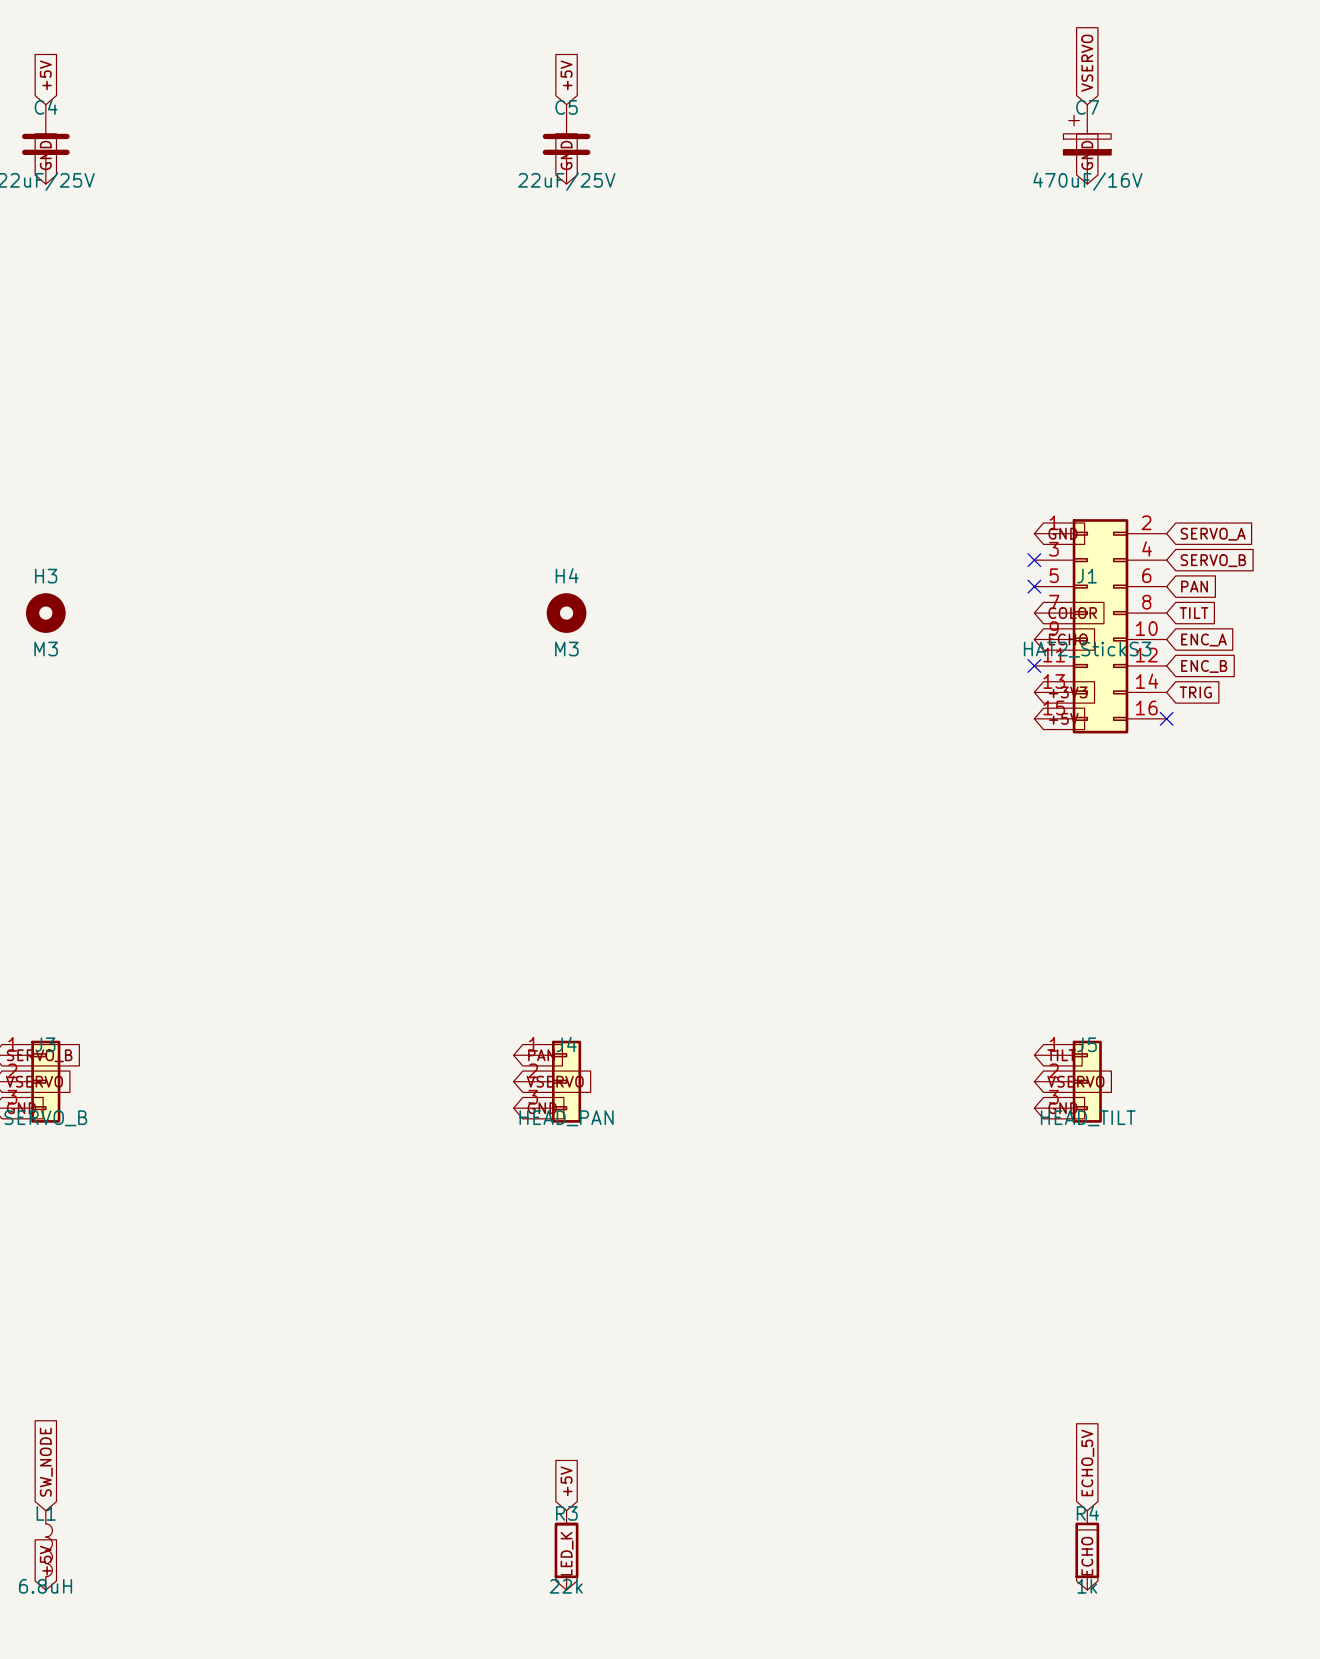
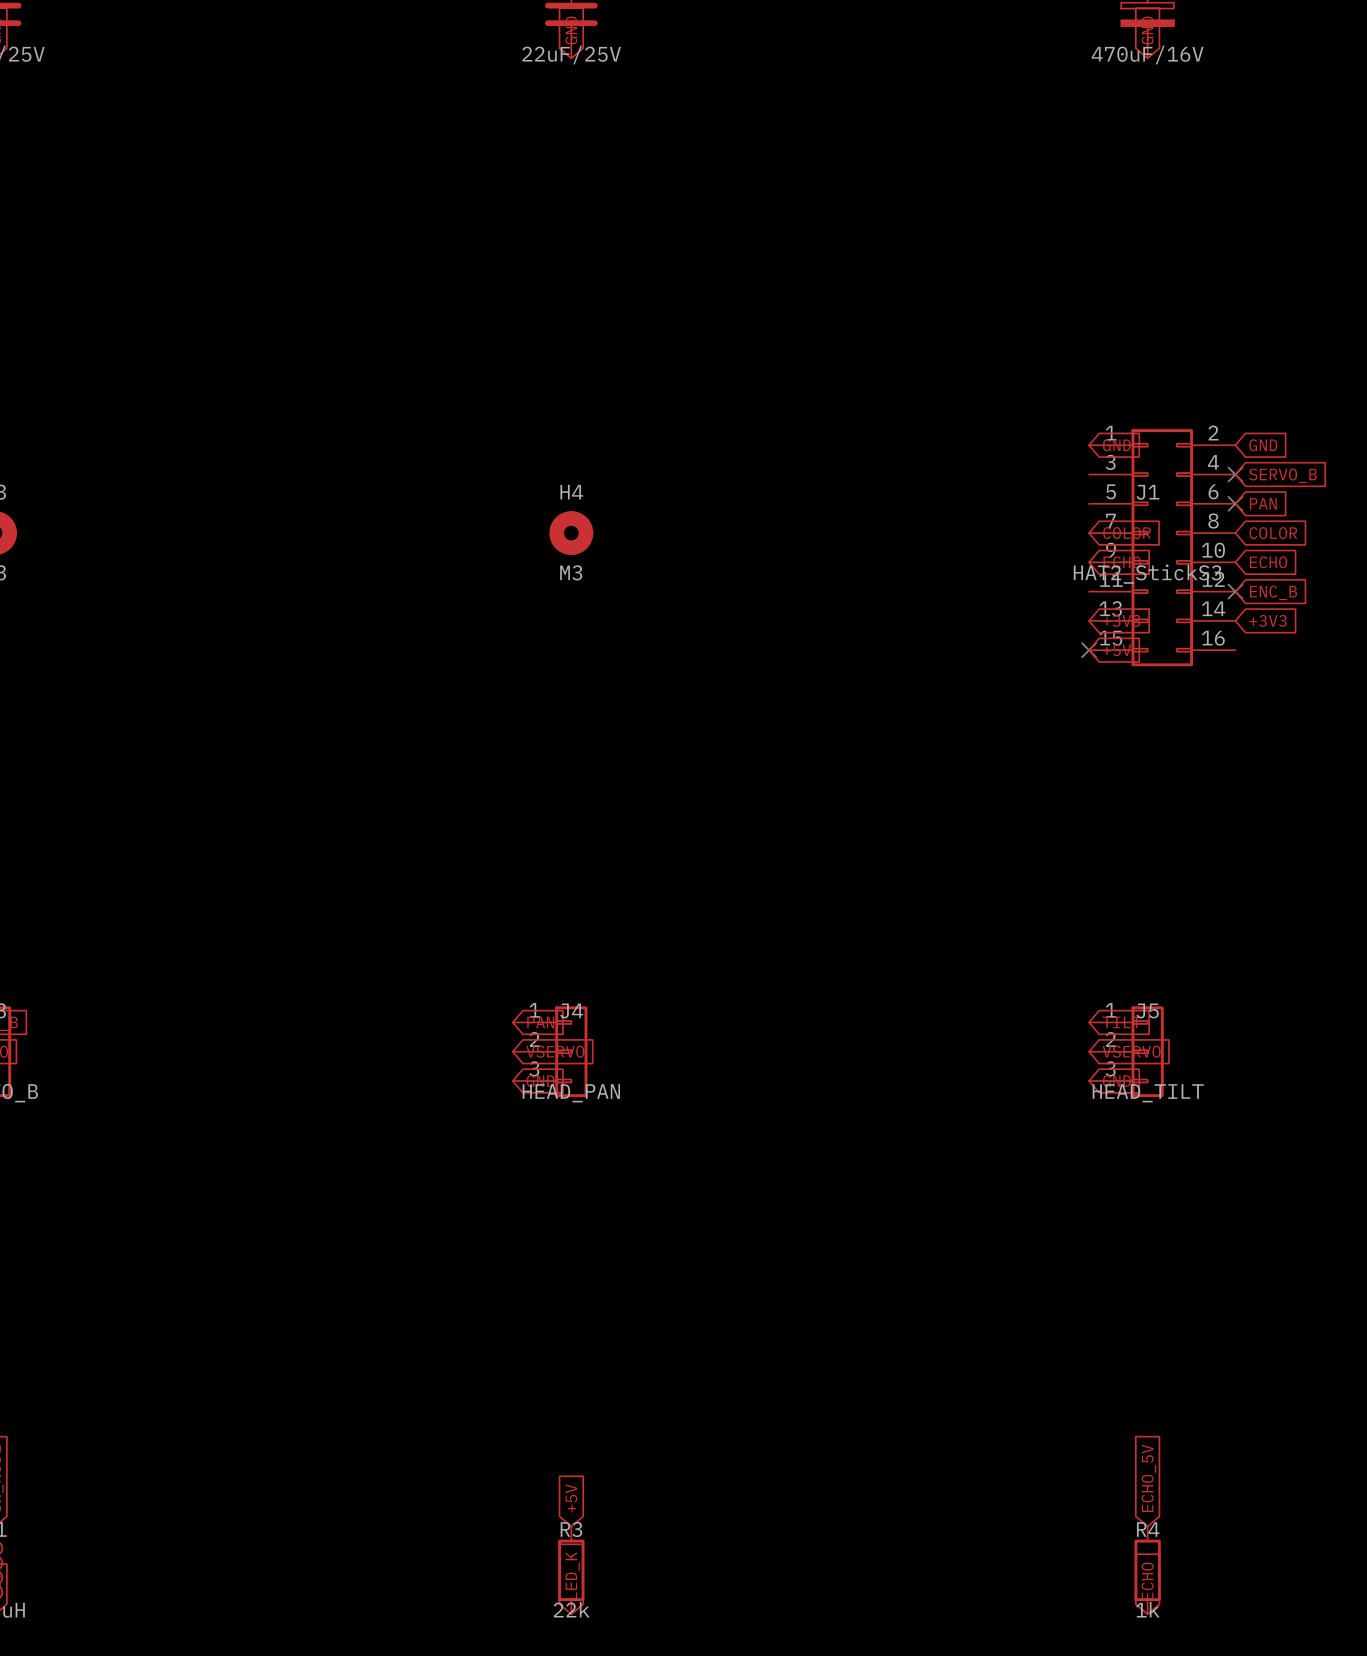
global label: SERVO_A (1213, 534) -> GND (1263, 445)
no-connect mark: (1034, 560) -> none
no-connect mark: none -> (1235, 474)
no-connect mark: (1034, 586) -> none
no-connect mark: none -> (1235, 503)
global label: TILT (1194, 613) -> COLOR (1273, 533)
global label: ENC_A (1203, 640) -> ECHO (1268, 562)
no-connect mark position: (1034, 665) -> (1089, 650)
global label: TRIG (1195, 692) -> +3V3 (1268, 620)
no-connect mark position: (1166, 718) -> (1235, 591)

